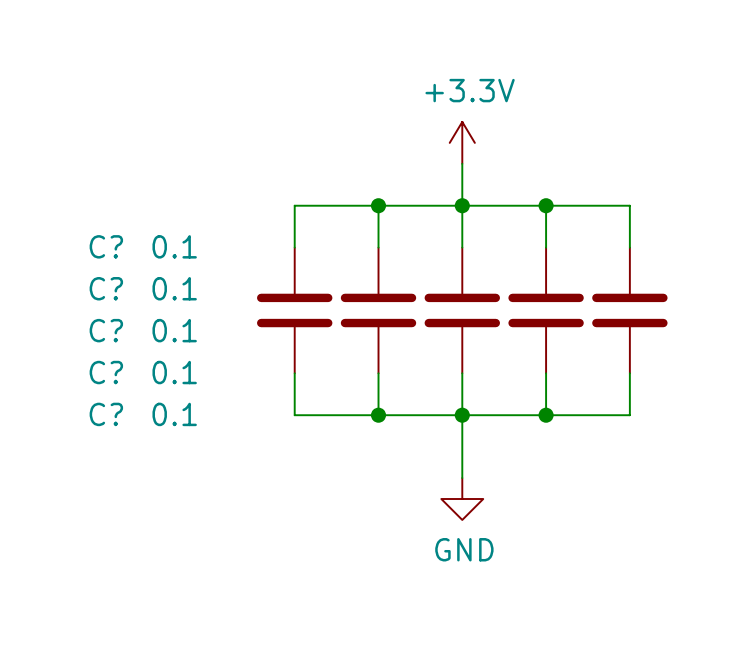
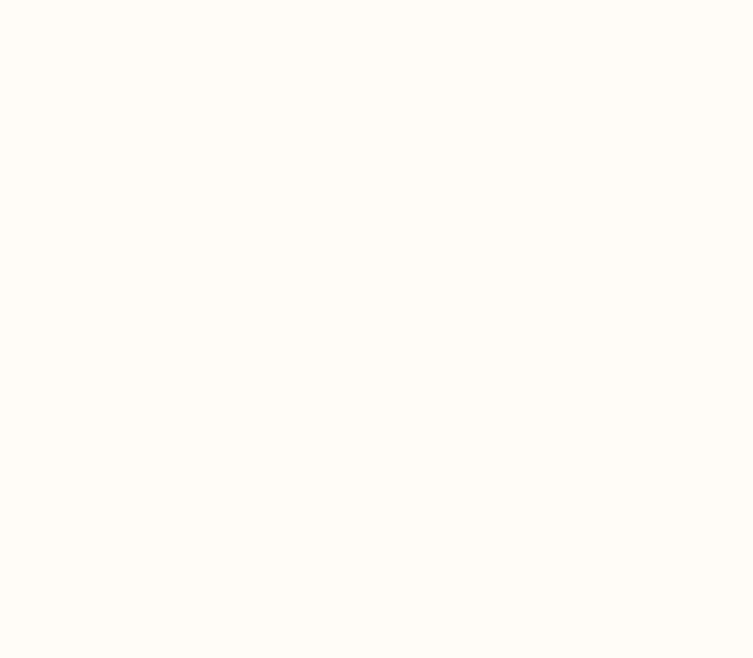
power symbol: +3.3V (462, 142) -> none
wire: (462, 163) (462, 247) -> none
wire: (378, 205) (378, 247) -> none
junction: (378, 205) -> none
junction: (462, 205) -> none
wire: (546, 205) (546, 247) -> none
junction: (546, 205) -> none
wire: (294, 247) (294, 205) (629, 205) (629, 247) -> none
C?: 0.1 (294, 310) -> none
C?: 0.1 (378, 310) -> none
C?: 0.1 (462, 310) -> none
C?: 0.1 (546, 310) -> none
C?: 0.1 (629, 310) -> none
wire: (294, 373) (294, 415) (629, 415) (629, 373) -> none
wire: (378, 373) (378, 415) -> none
wire: (462, 373) (462, 478) -> none
wire: (546, 373) (546, 415) -> none
junction: (378, 415) -> none
junction: (462, 415) -> none
junction: (546, 415) -> none
power symbol: GND (462, 499) -> none

